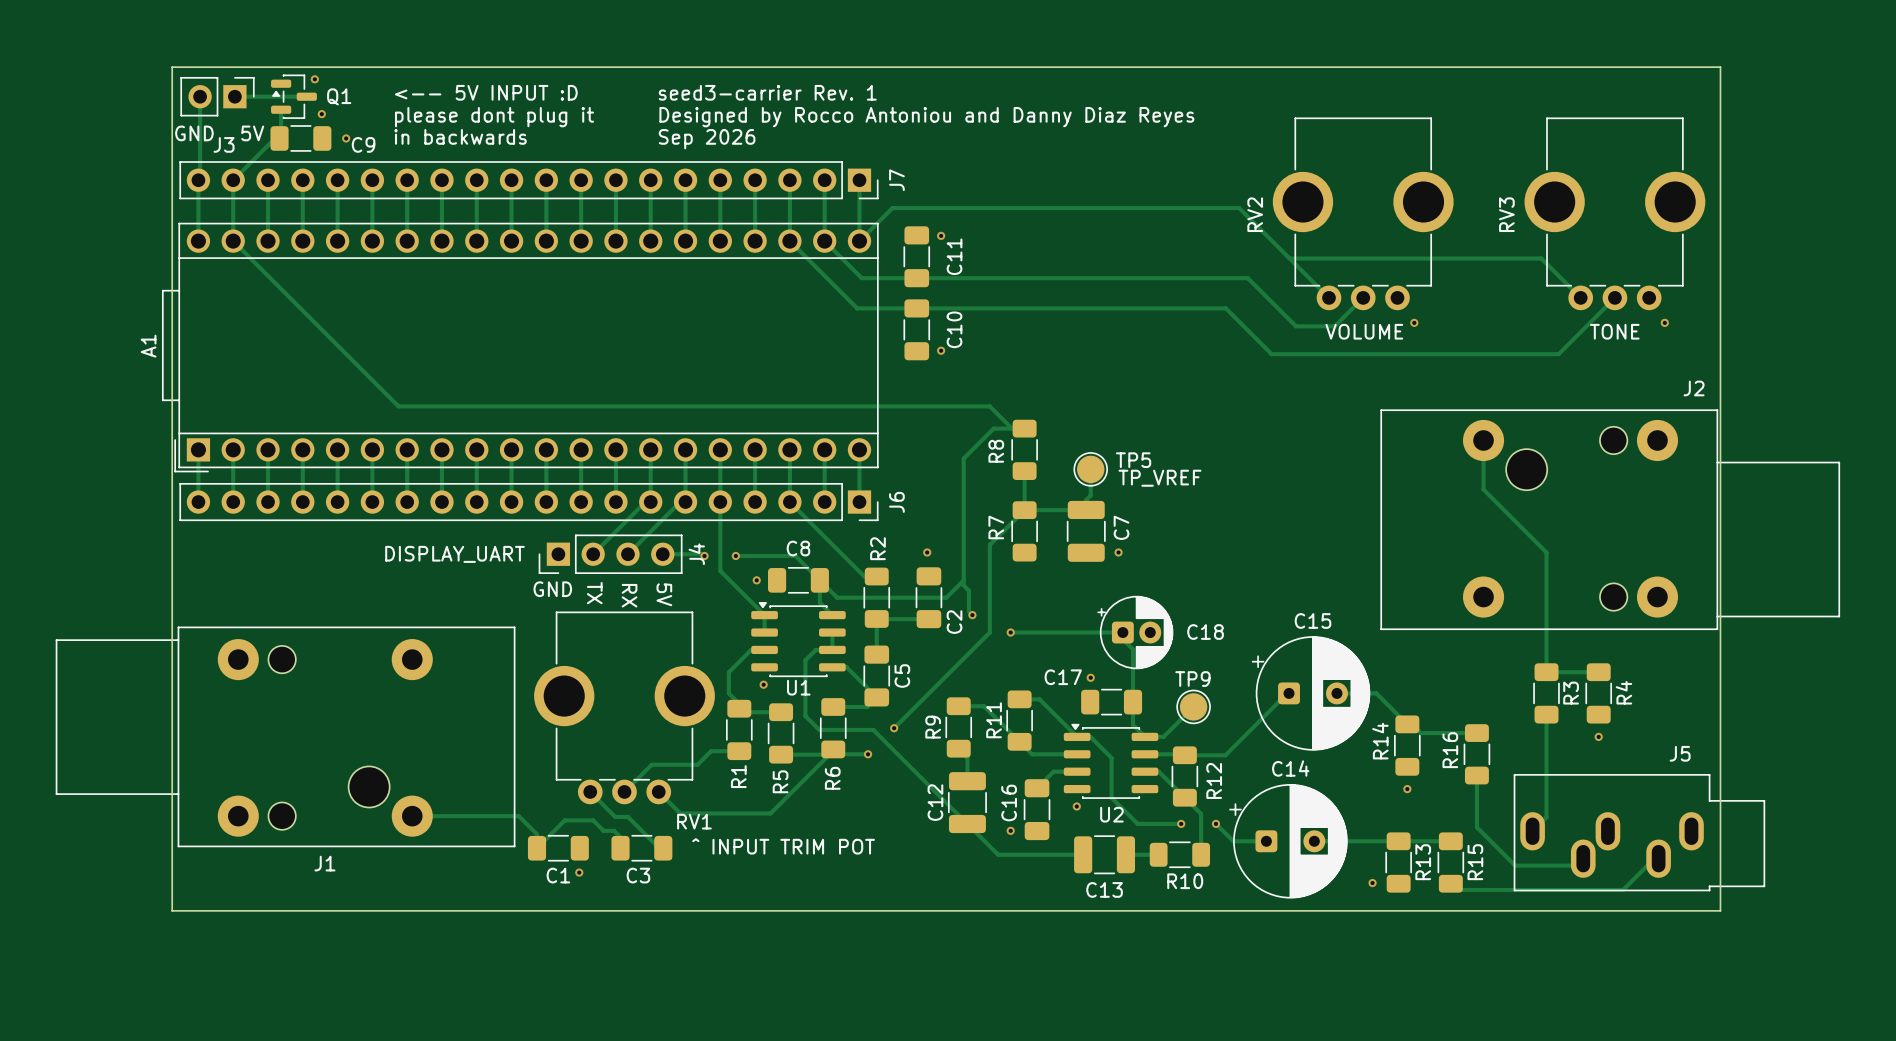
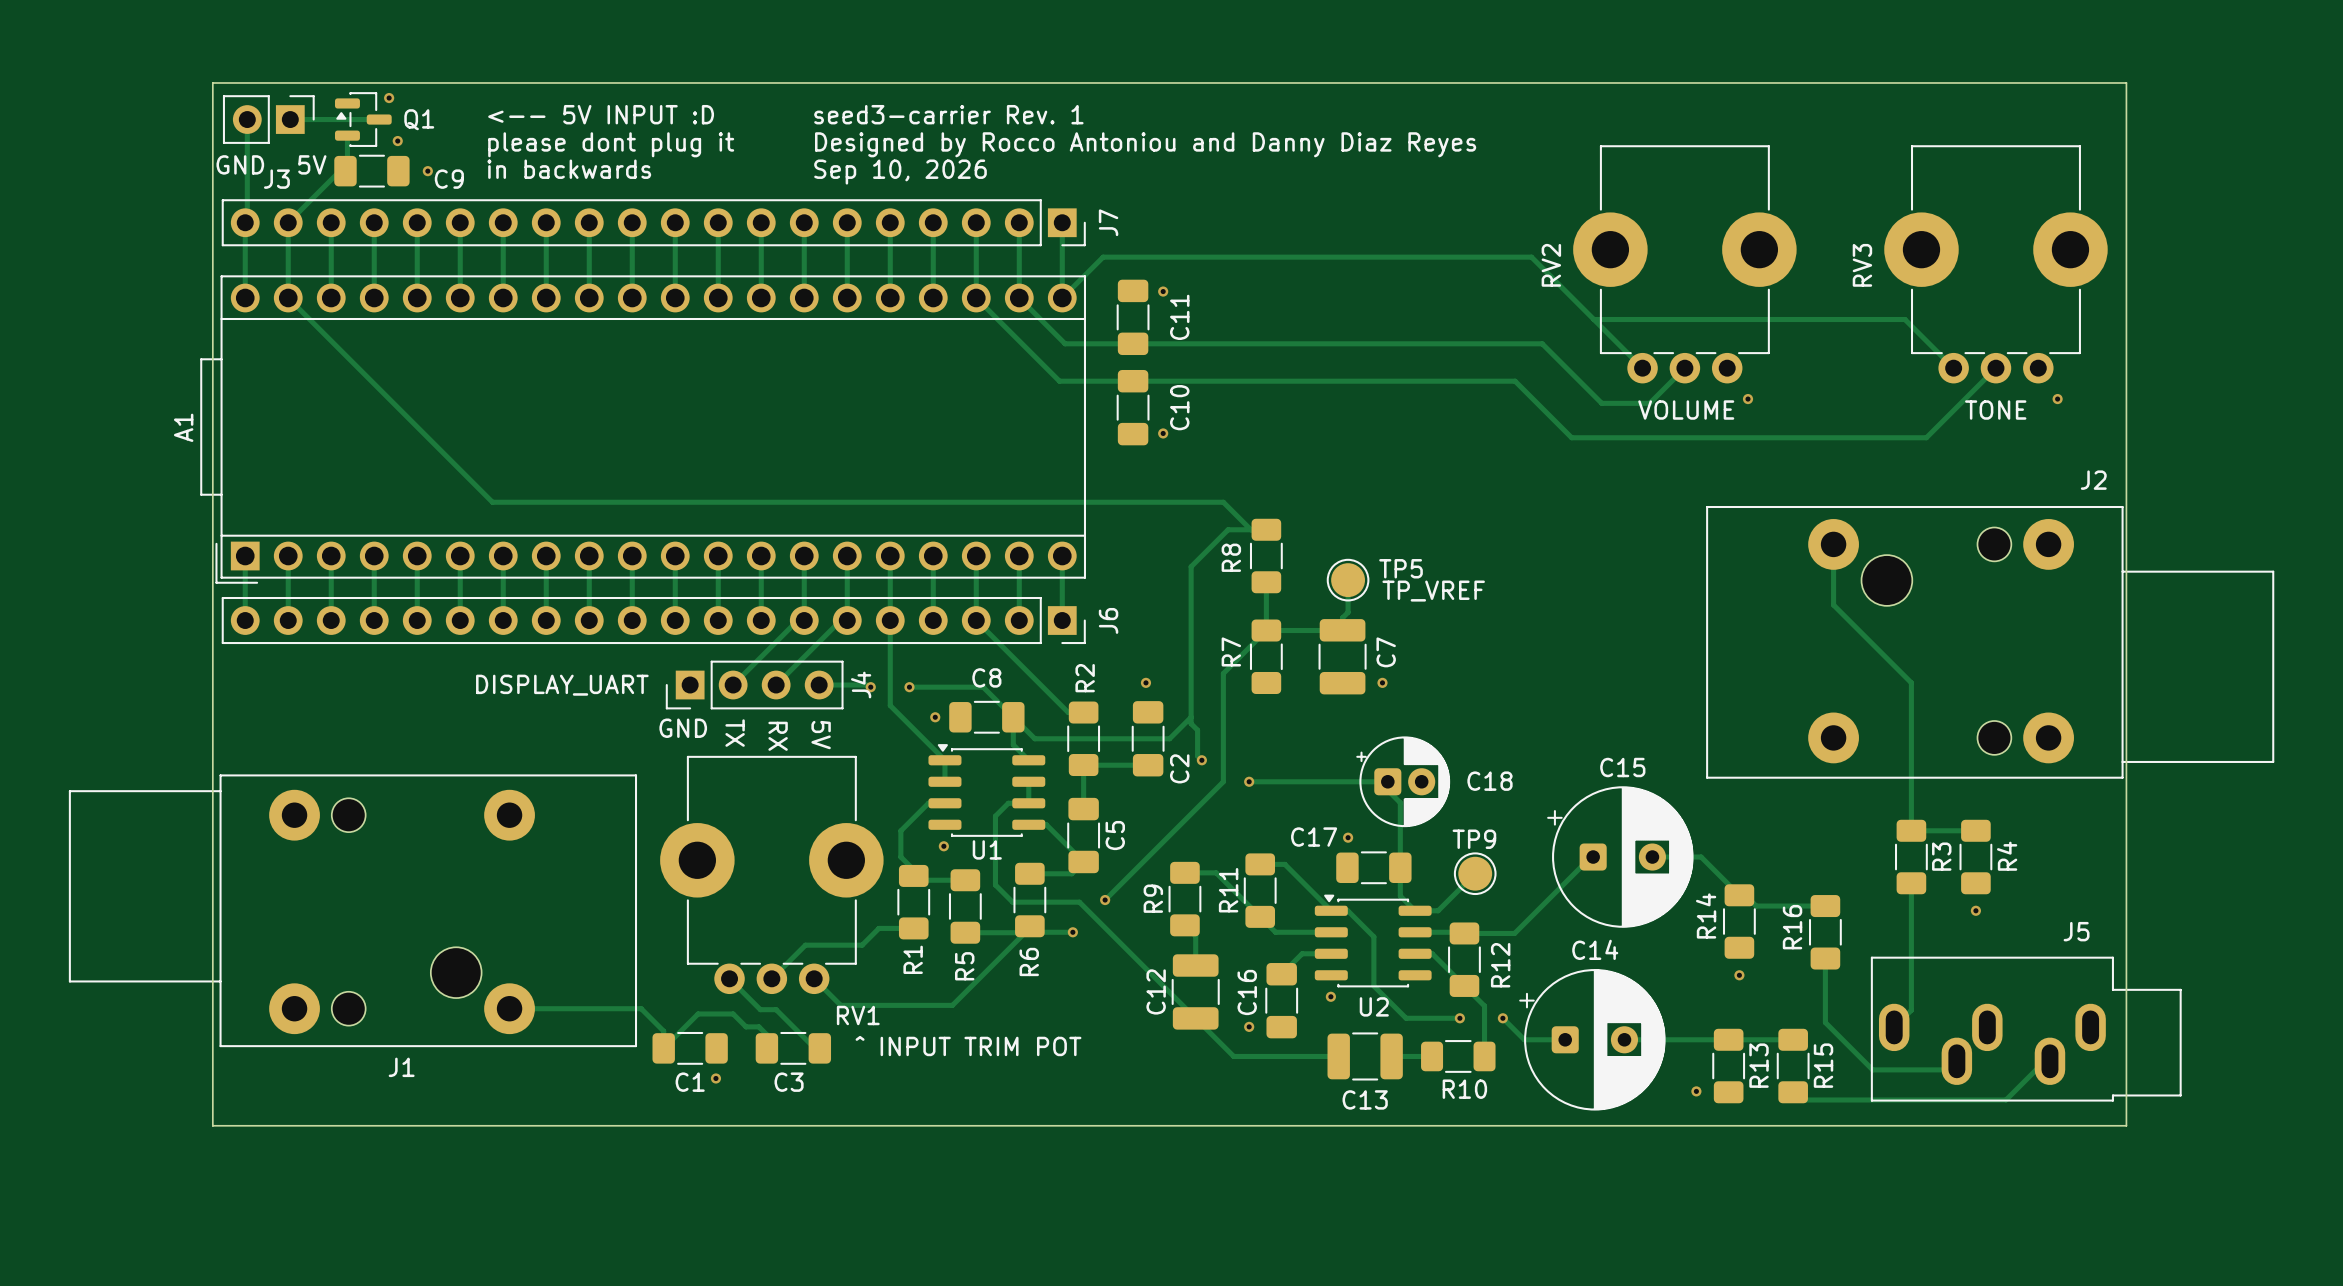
RV2 footprint: [1272, 117, 1454, 311] -> [1573, 145, 1797, 384]
RV3 footprint: [1524, 117, 1706, 311] -> [1884, 145, 2108, 384]
text: Sep 2026 (707, 139) -> Sep 10, 2026 (900, 172)
RV1 footprint: [534, 611, 715, 805] -> [660, 755, 884, 995]

